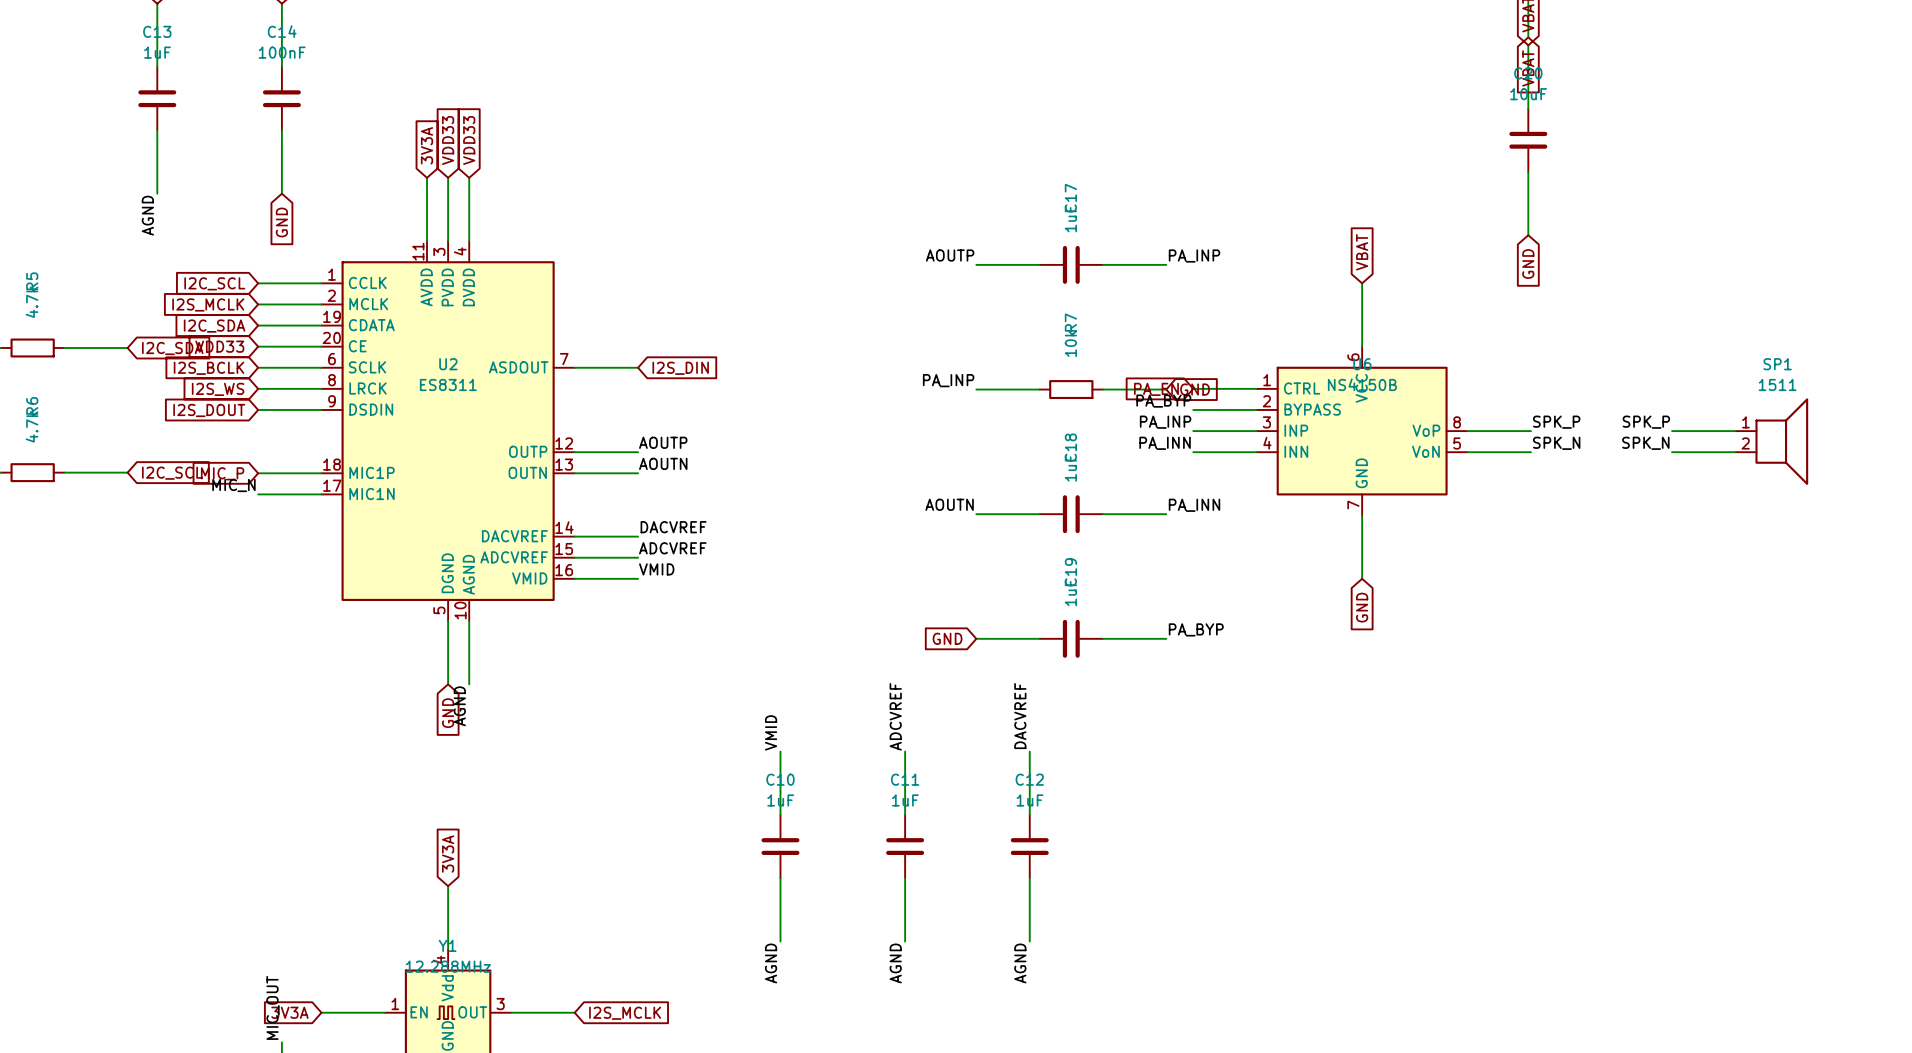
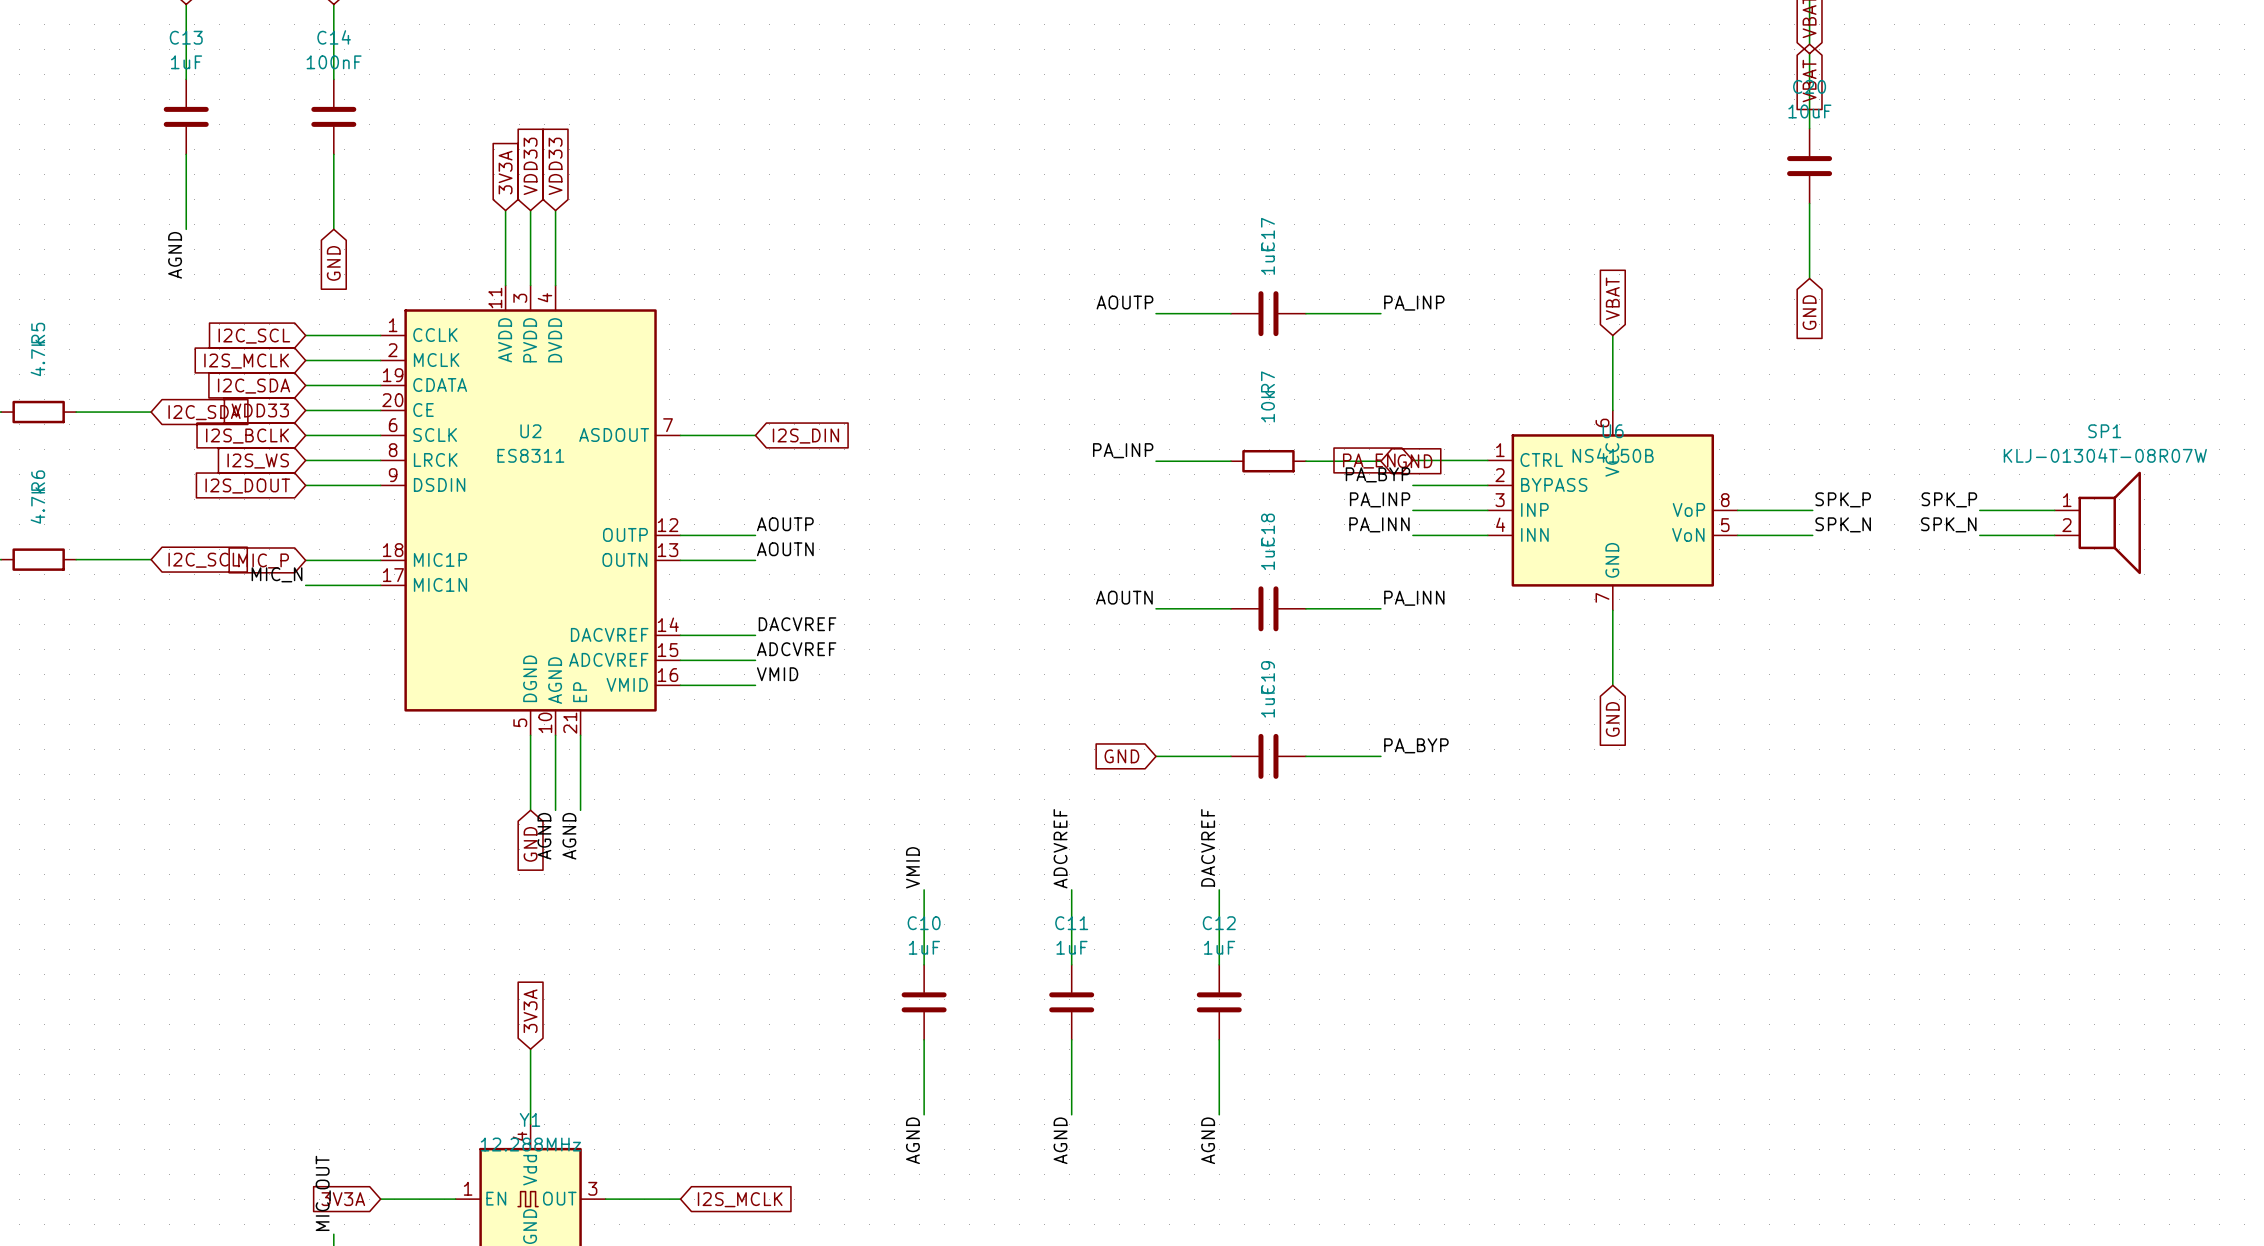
U2 symbol: [321, 241, 575, 622] -> [380, 285, 681, 736]
SP1 value: 1511 (1777, 384) -> KLJ-01304T-08R07W (2105, 455)
wire: none -> (580, 735) (580, 810)
label: none -> AGND (569, 836)

